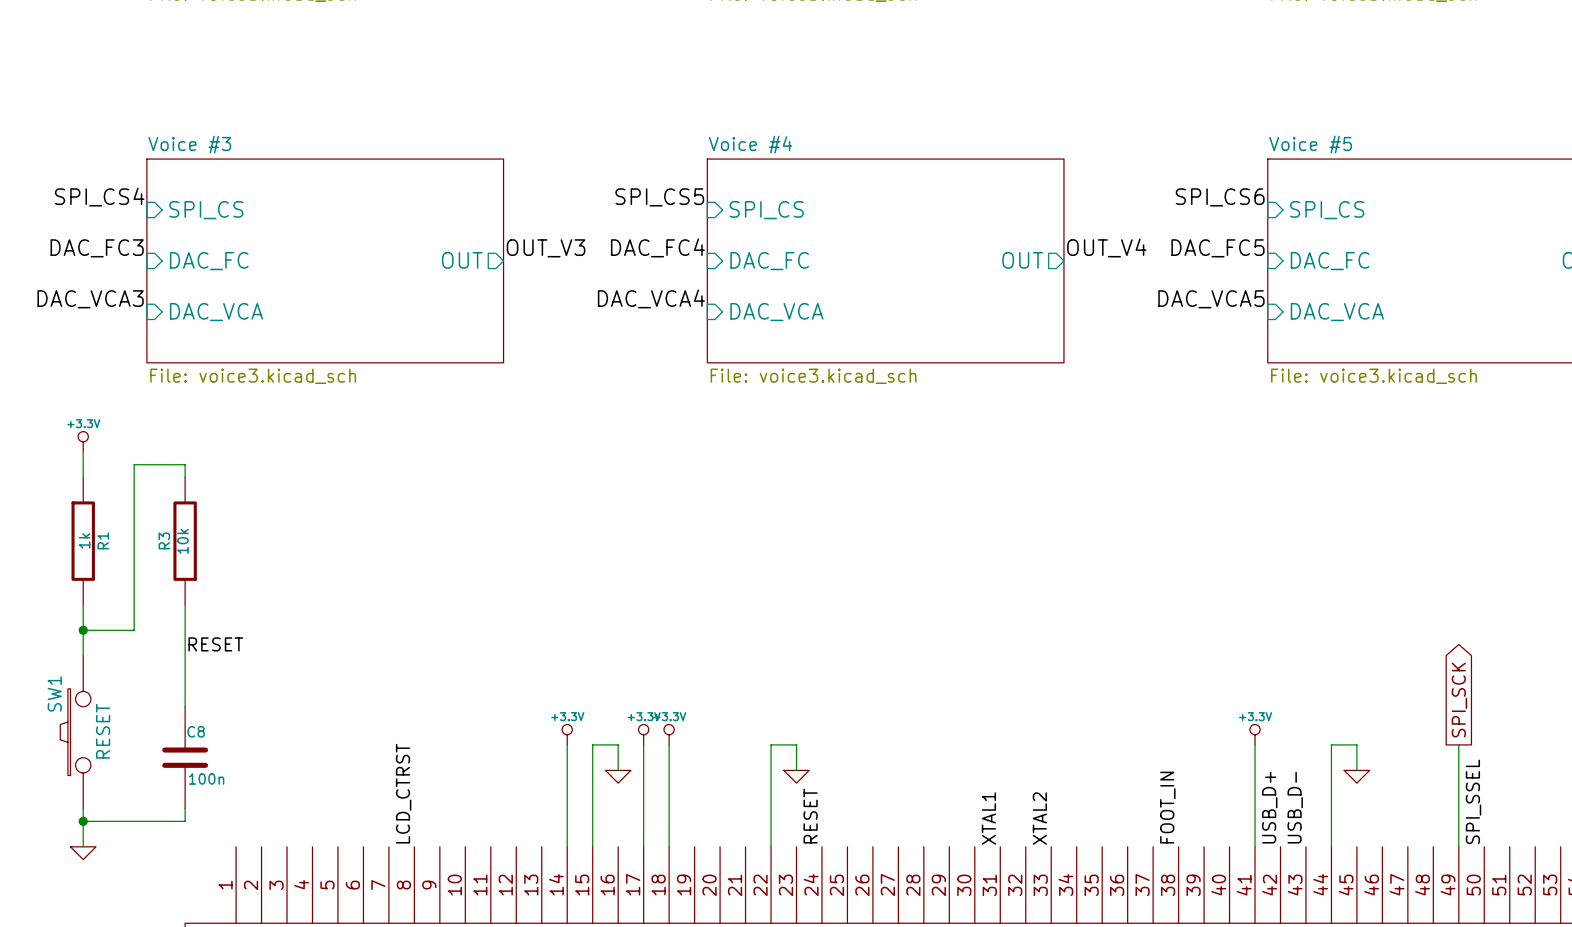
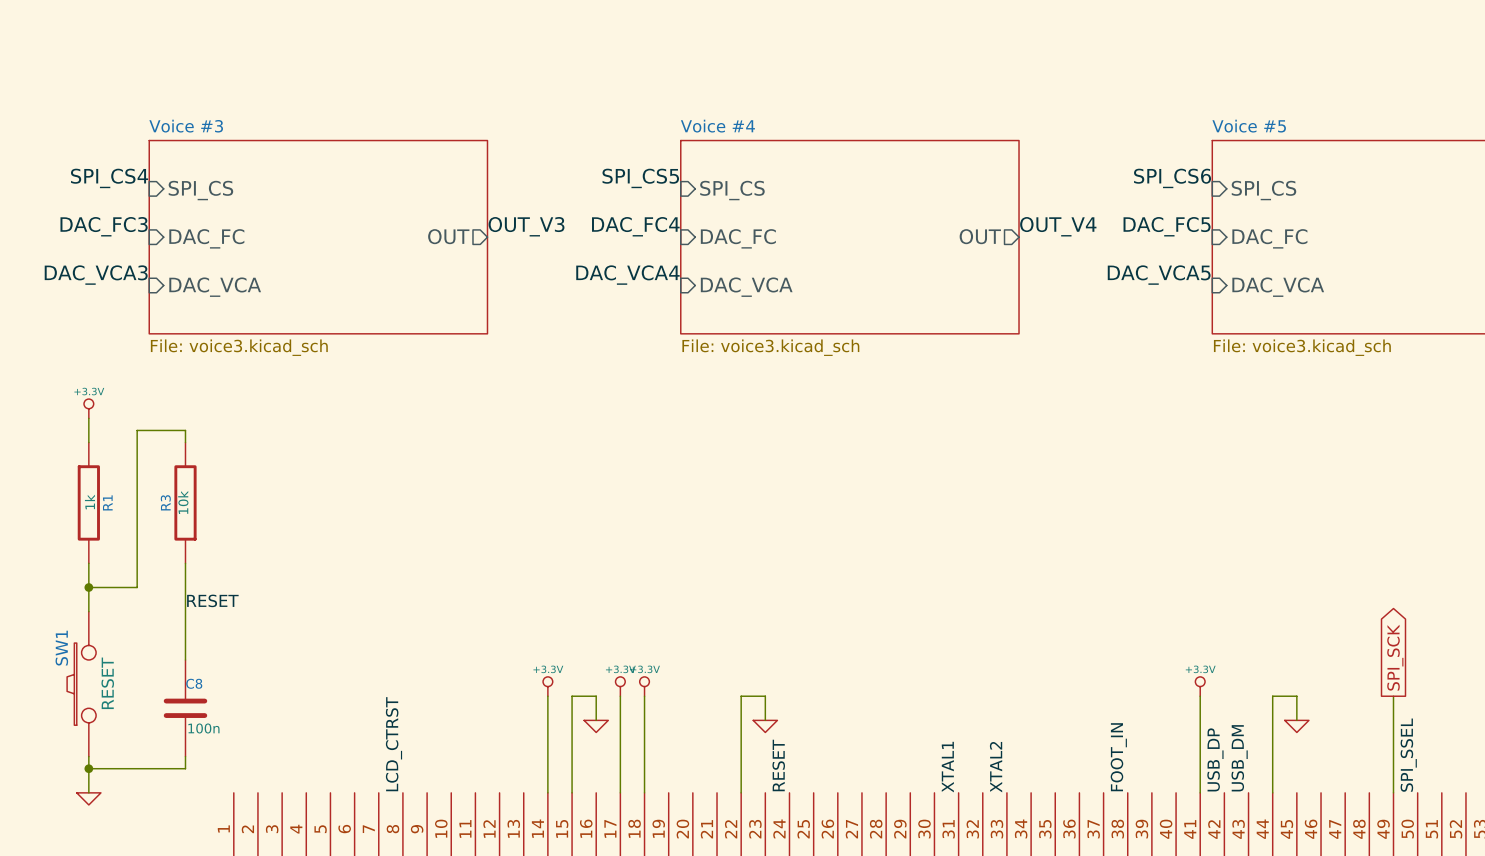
label: USB_D+ (1269, 807) -> USB_DP (1215, 759)
label: USB_D- (1295, 807) -> USB_DM (1239, 758)

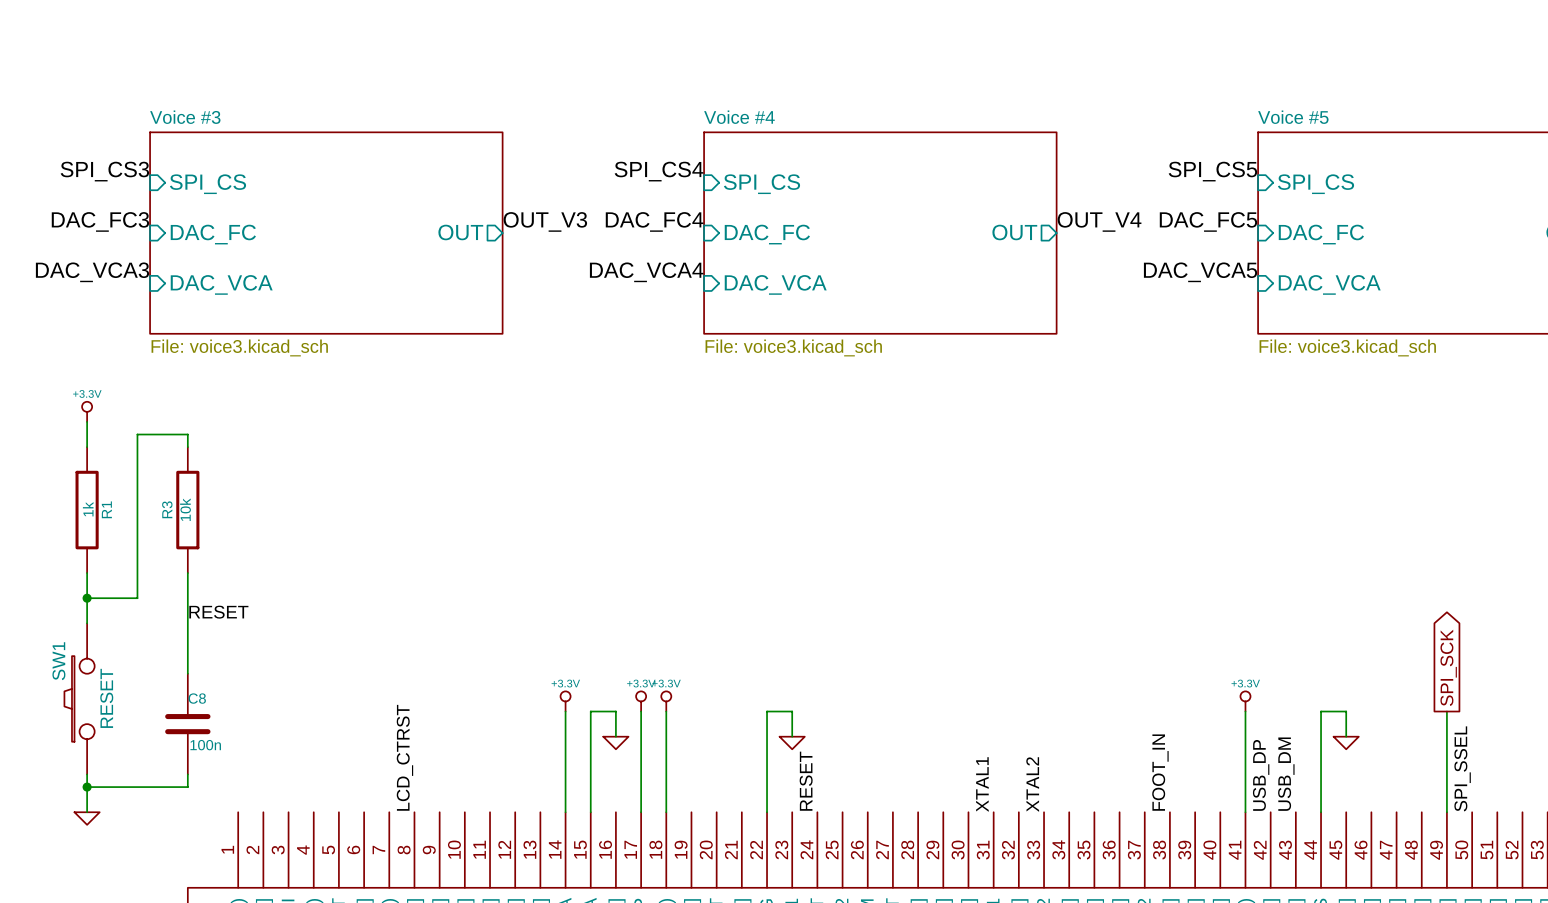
label: SPI_CS4 (109, 178) -> SPI_CS3 (104, 171)
label: SPI_CS5 (640, 178) -> SPI_CS4 (659, 171)
label: SPI_CS6 (1172, 178) -> SPI_CS5 (1212, 171)

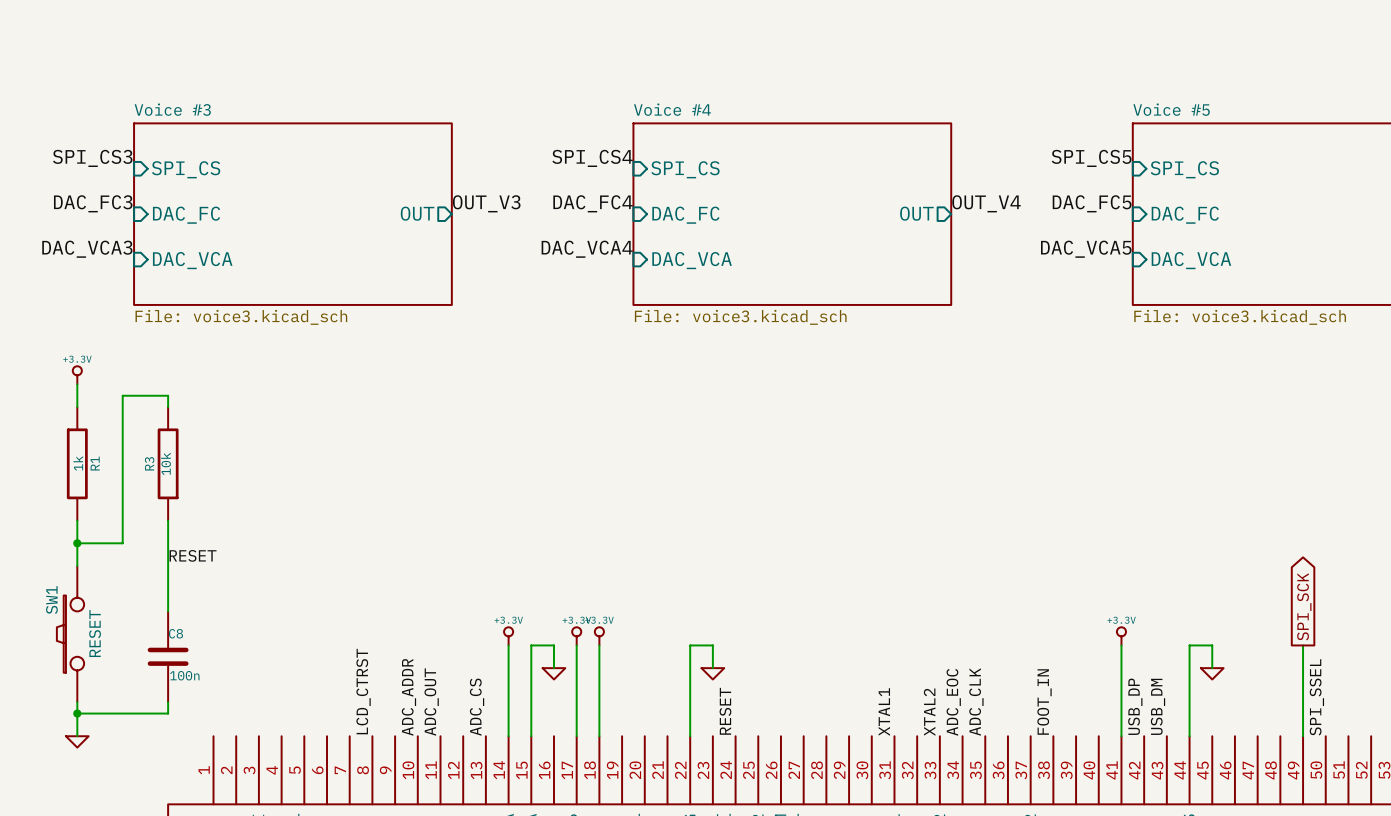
label: none -> ADC_ADDR (408, 697)
label: none -> ADC_OUT (431, 702)
label: none -> ADC_EOC (953, 702)
label: none -> ADC_CLK (976, 702)
label: none -> ADC_CS (477, 707)

